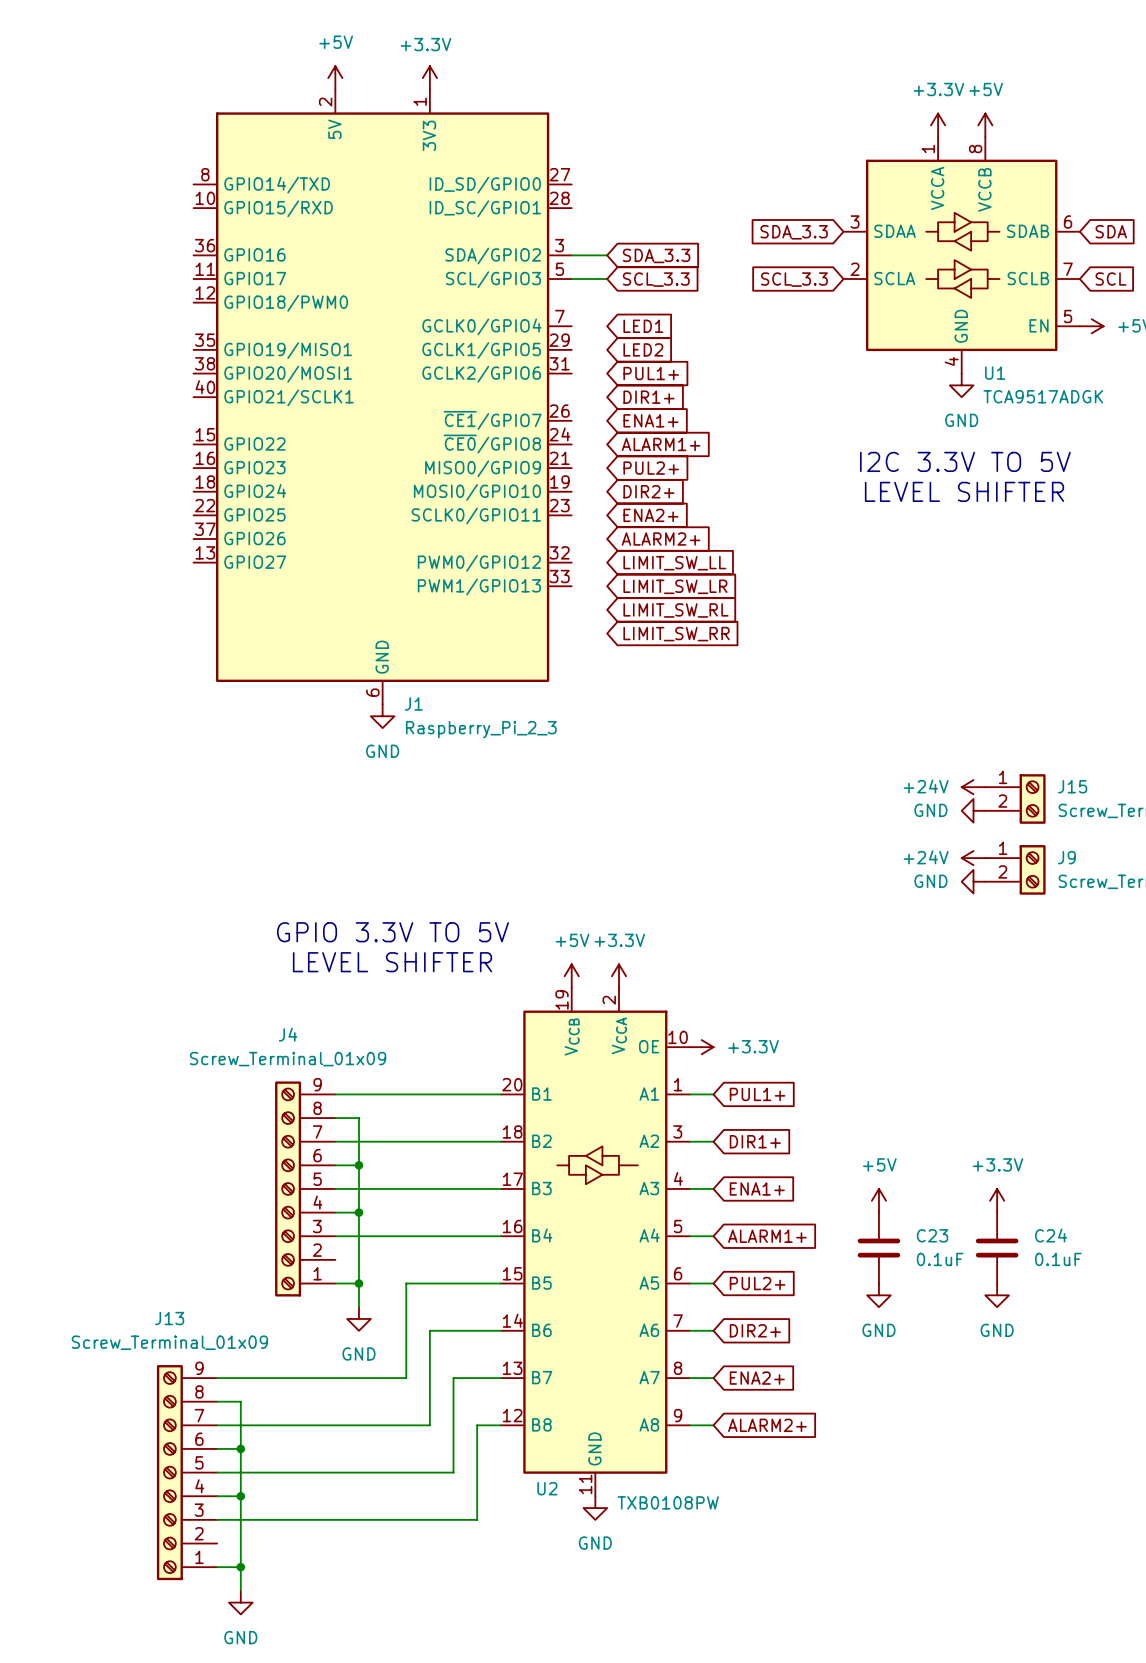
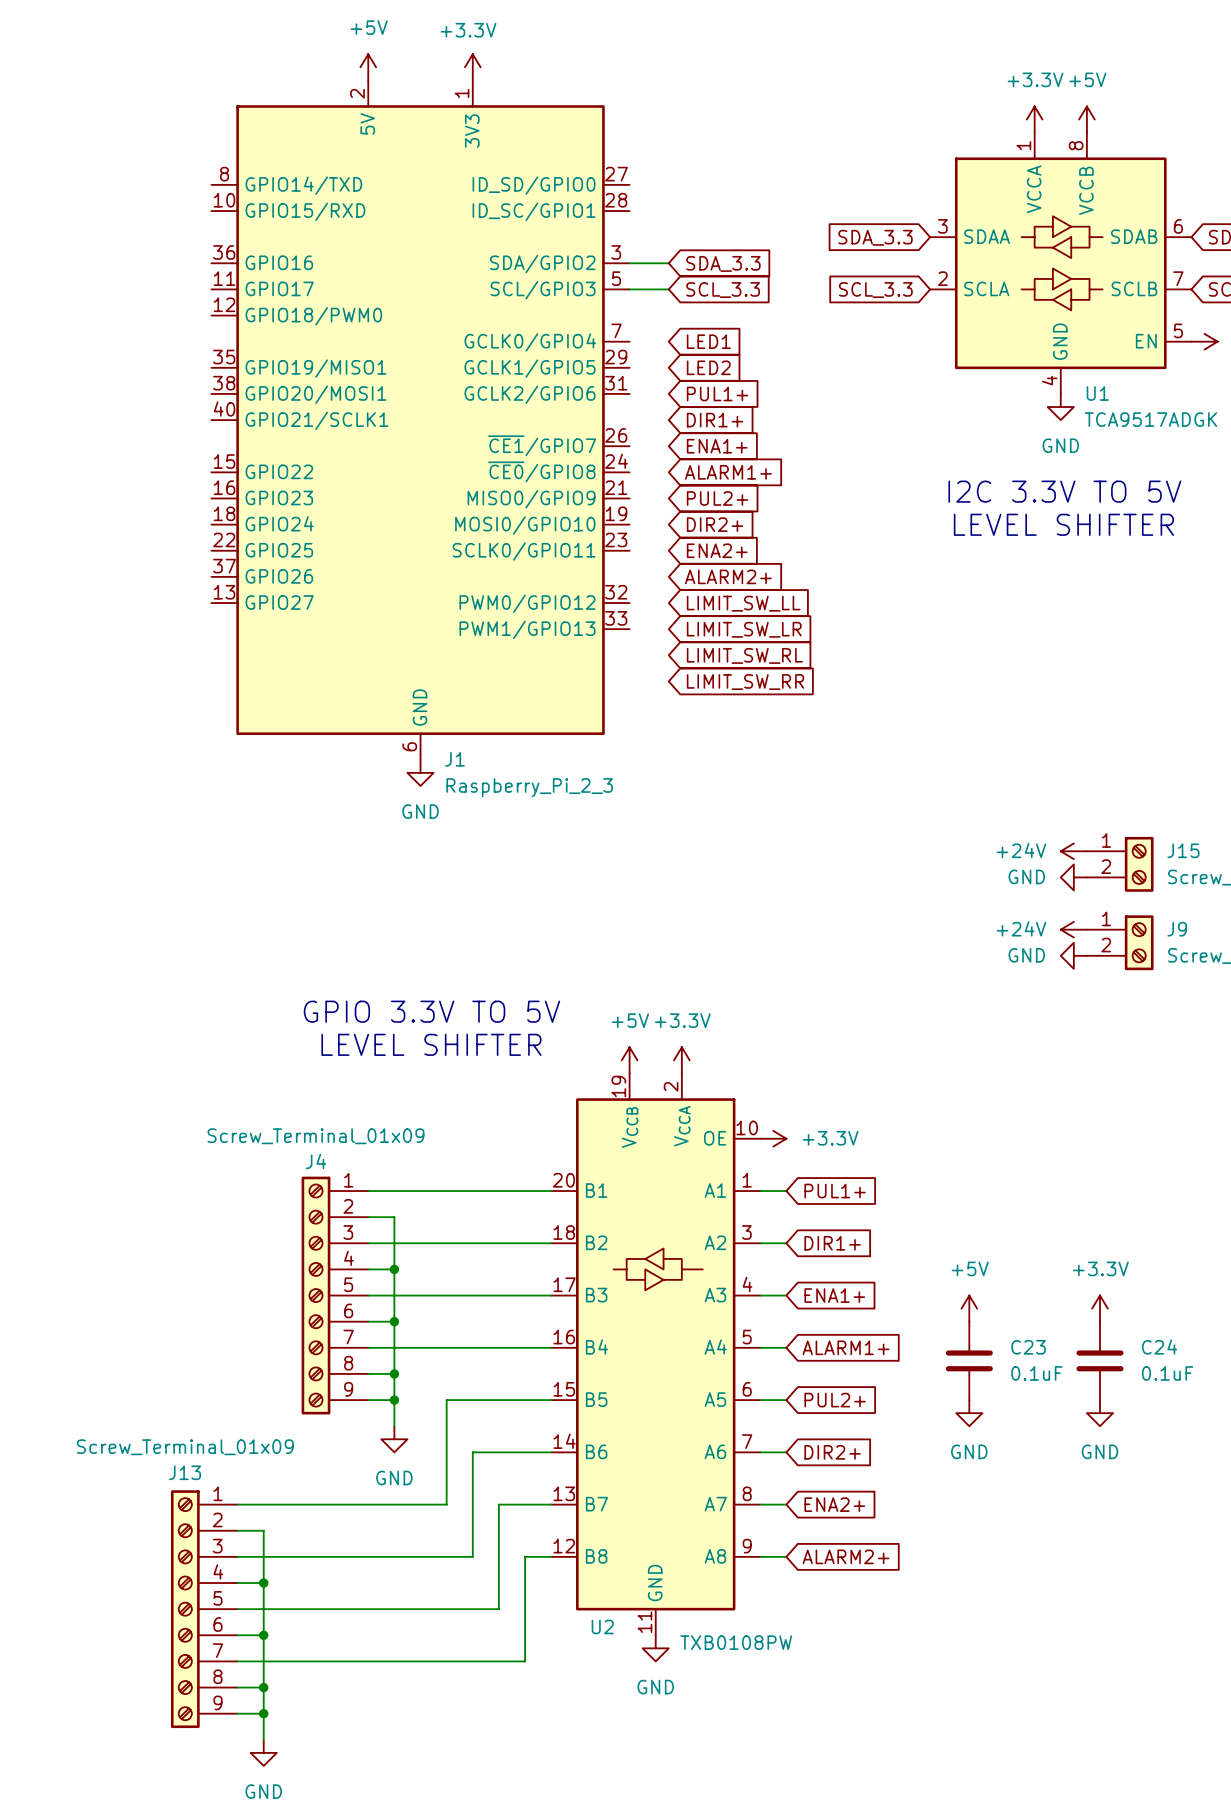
J4 name position: J4 (288, 1034) -> J4 (315, 1161)
J4 flip: as is (288, 1188) -> up-down (315, 1295)
wire: none -> (368, 1373) (394, 1373)
junction: none -> (394, 1373)
J13 name position: J13 (169, 1318) -> J13 (185, 1472)
J13 flip: as is (169, 1472) -> up-down (185, 1609)
wire: none -> (237, 1687) (263, 1687)
junction: none -> (263, 1687)

